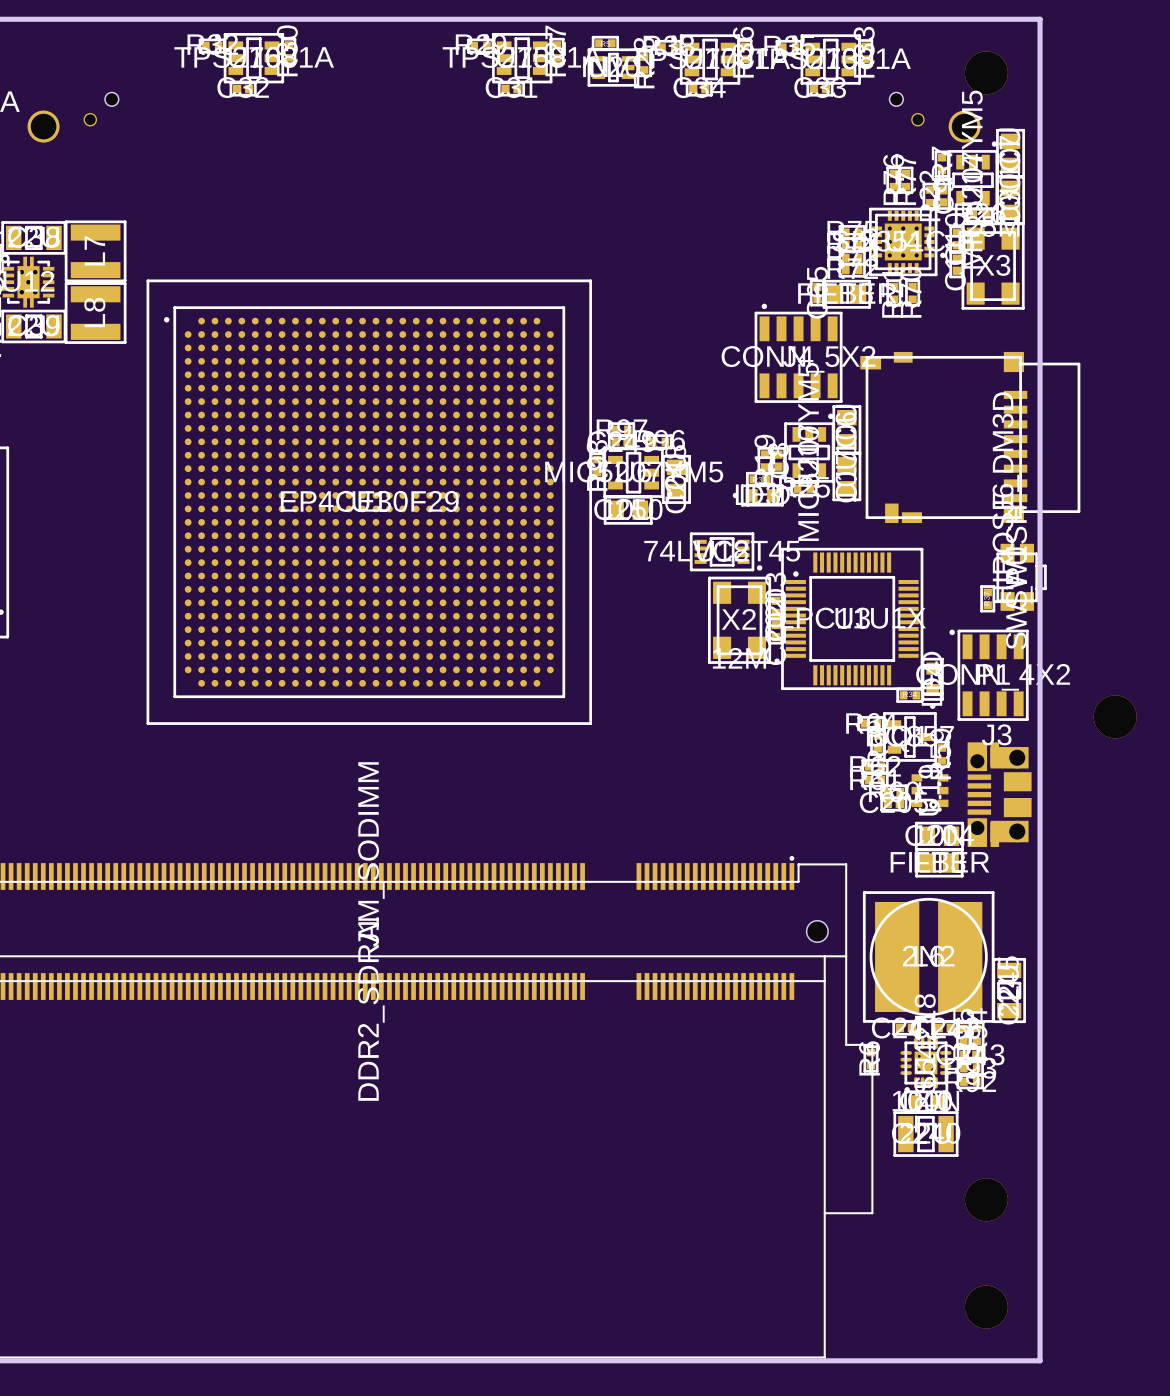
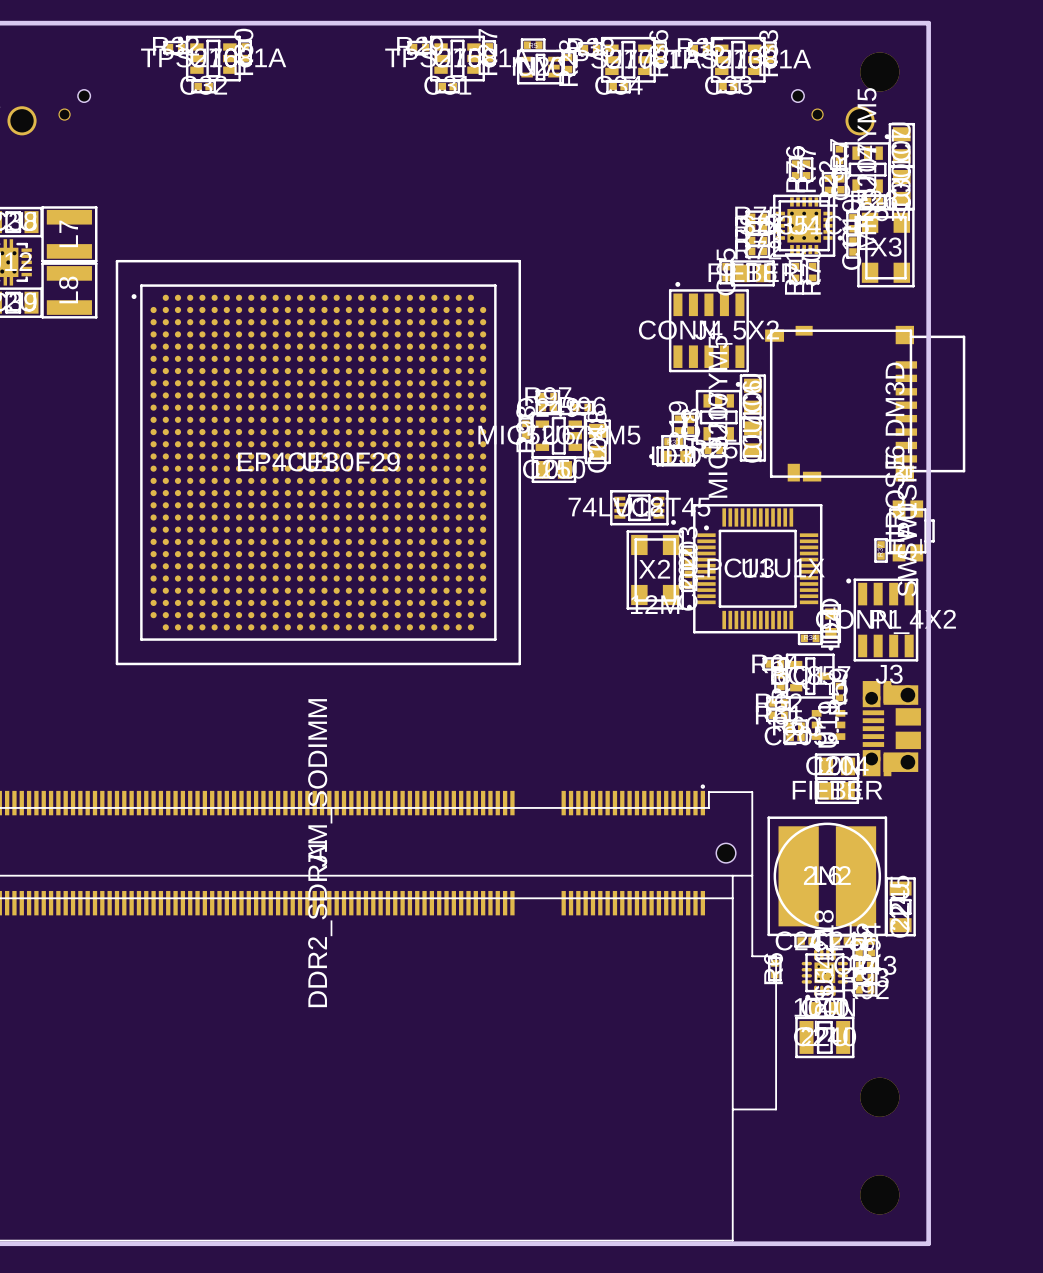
part: (1115, 716) -> none

